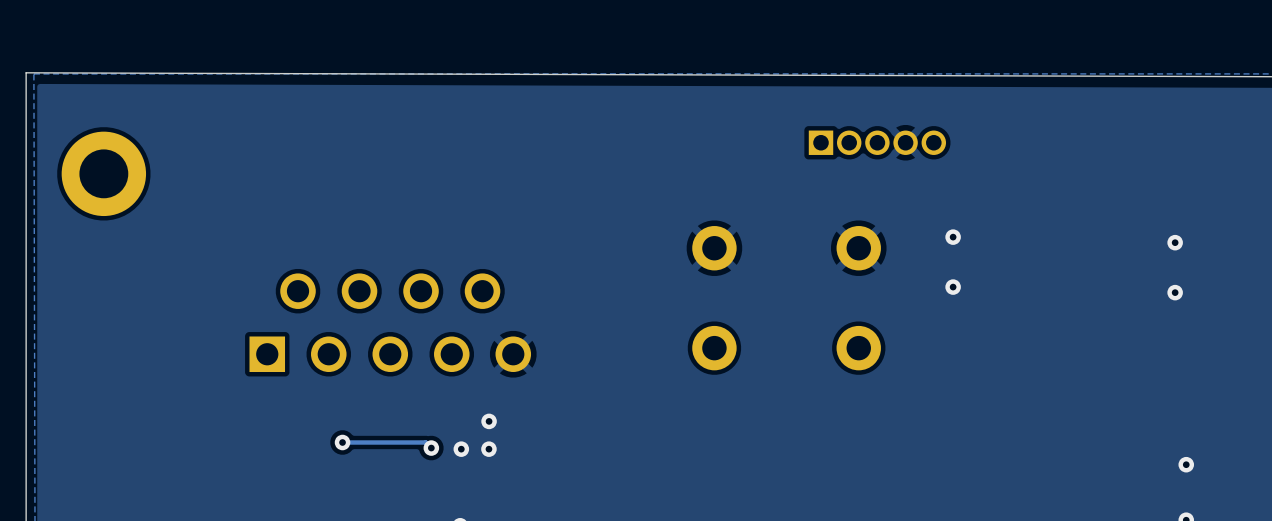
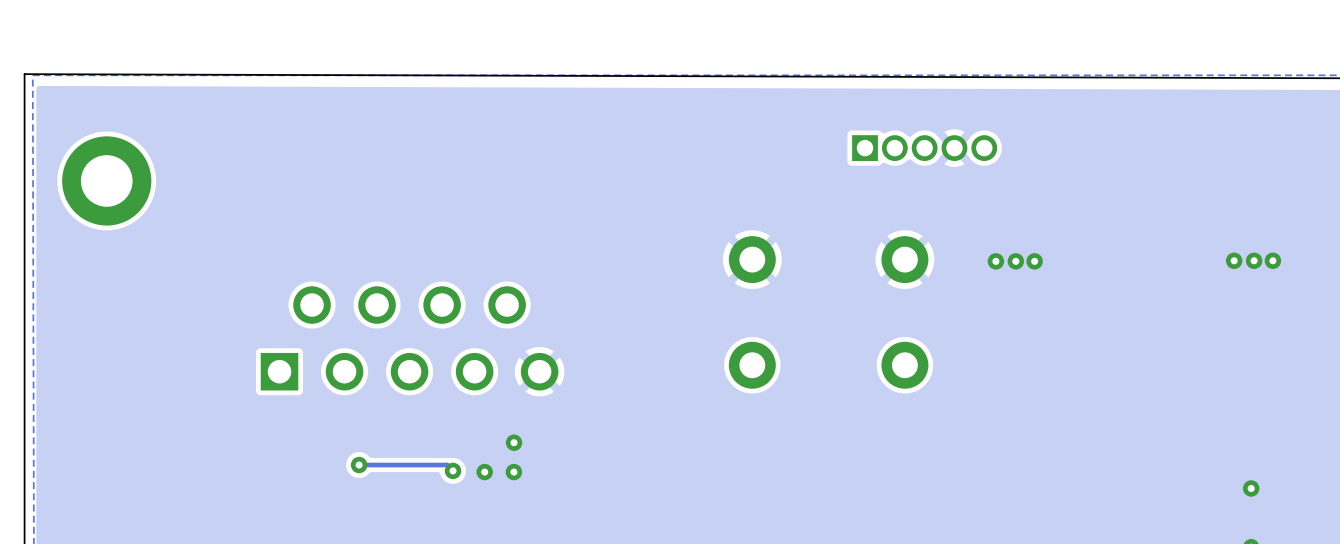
via: (953, 237) -> none
via: (1175, 242) -> none
via: none -> (995, 261)
via: none -> (1015, 261)
via: none -> (1034, 261)
via: none -> (1234, 260)
via: none -> (1254, 260)
via: none -> (1272, 260)
via: (953, 287) -> none
via: (1175, 292) -> none

